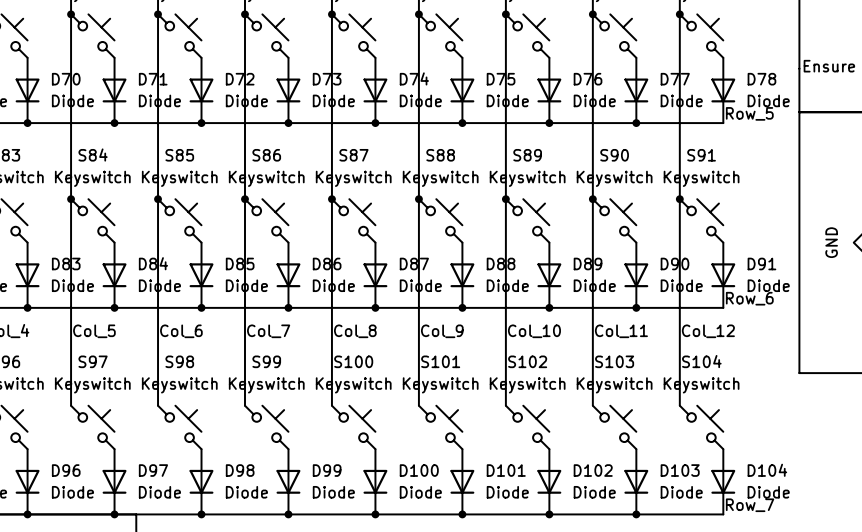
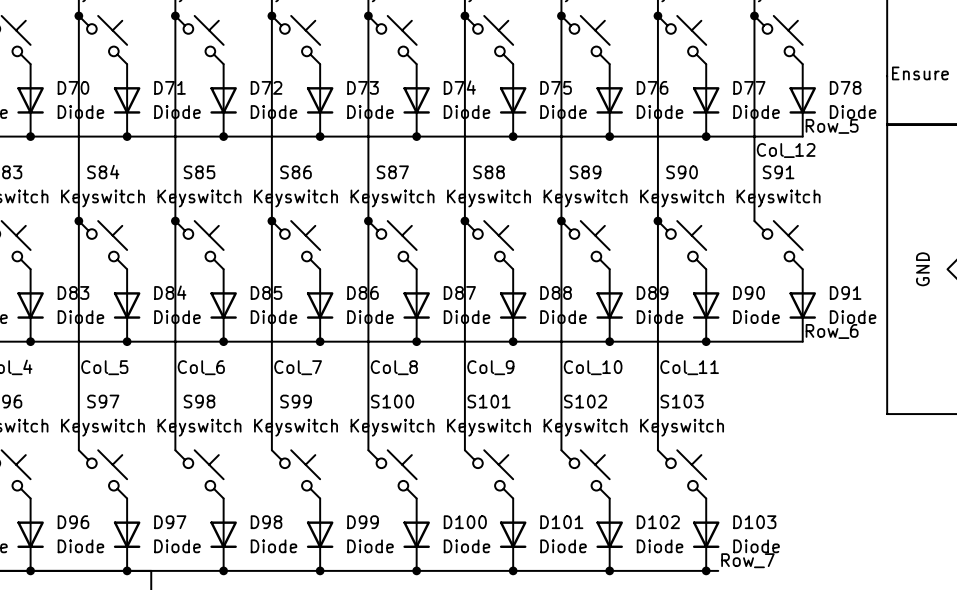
wire: (679, 199) (679, 405) -> none
junction: (679, 199) -> none
label position: Col_12 (708, 331) -> Col_12 (786, 150)
S104: Keyswitch (701, 427) -> none
D104: Diode (723, 481) -> none
label position: Row_7 (750, 505) -> Row_7 (747, 560)
wire: (647, 514) (723, 514) -> none

